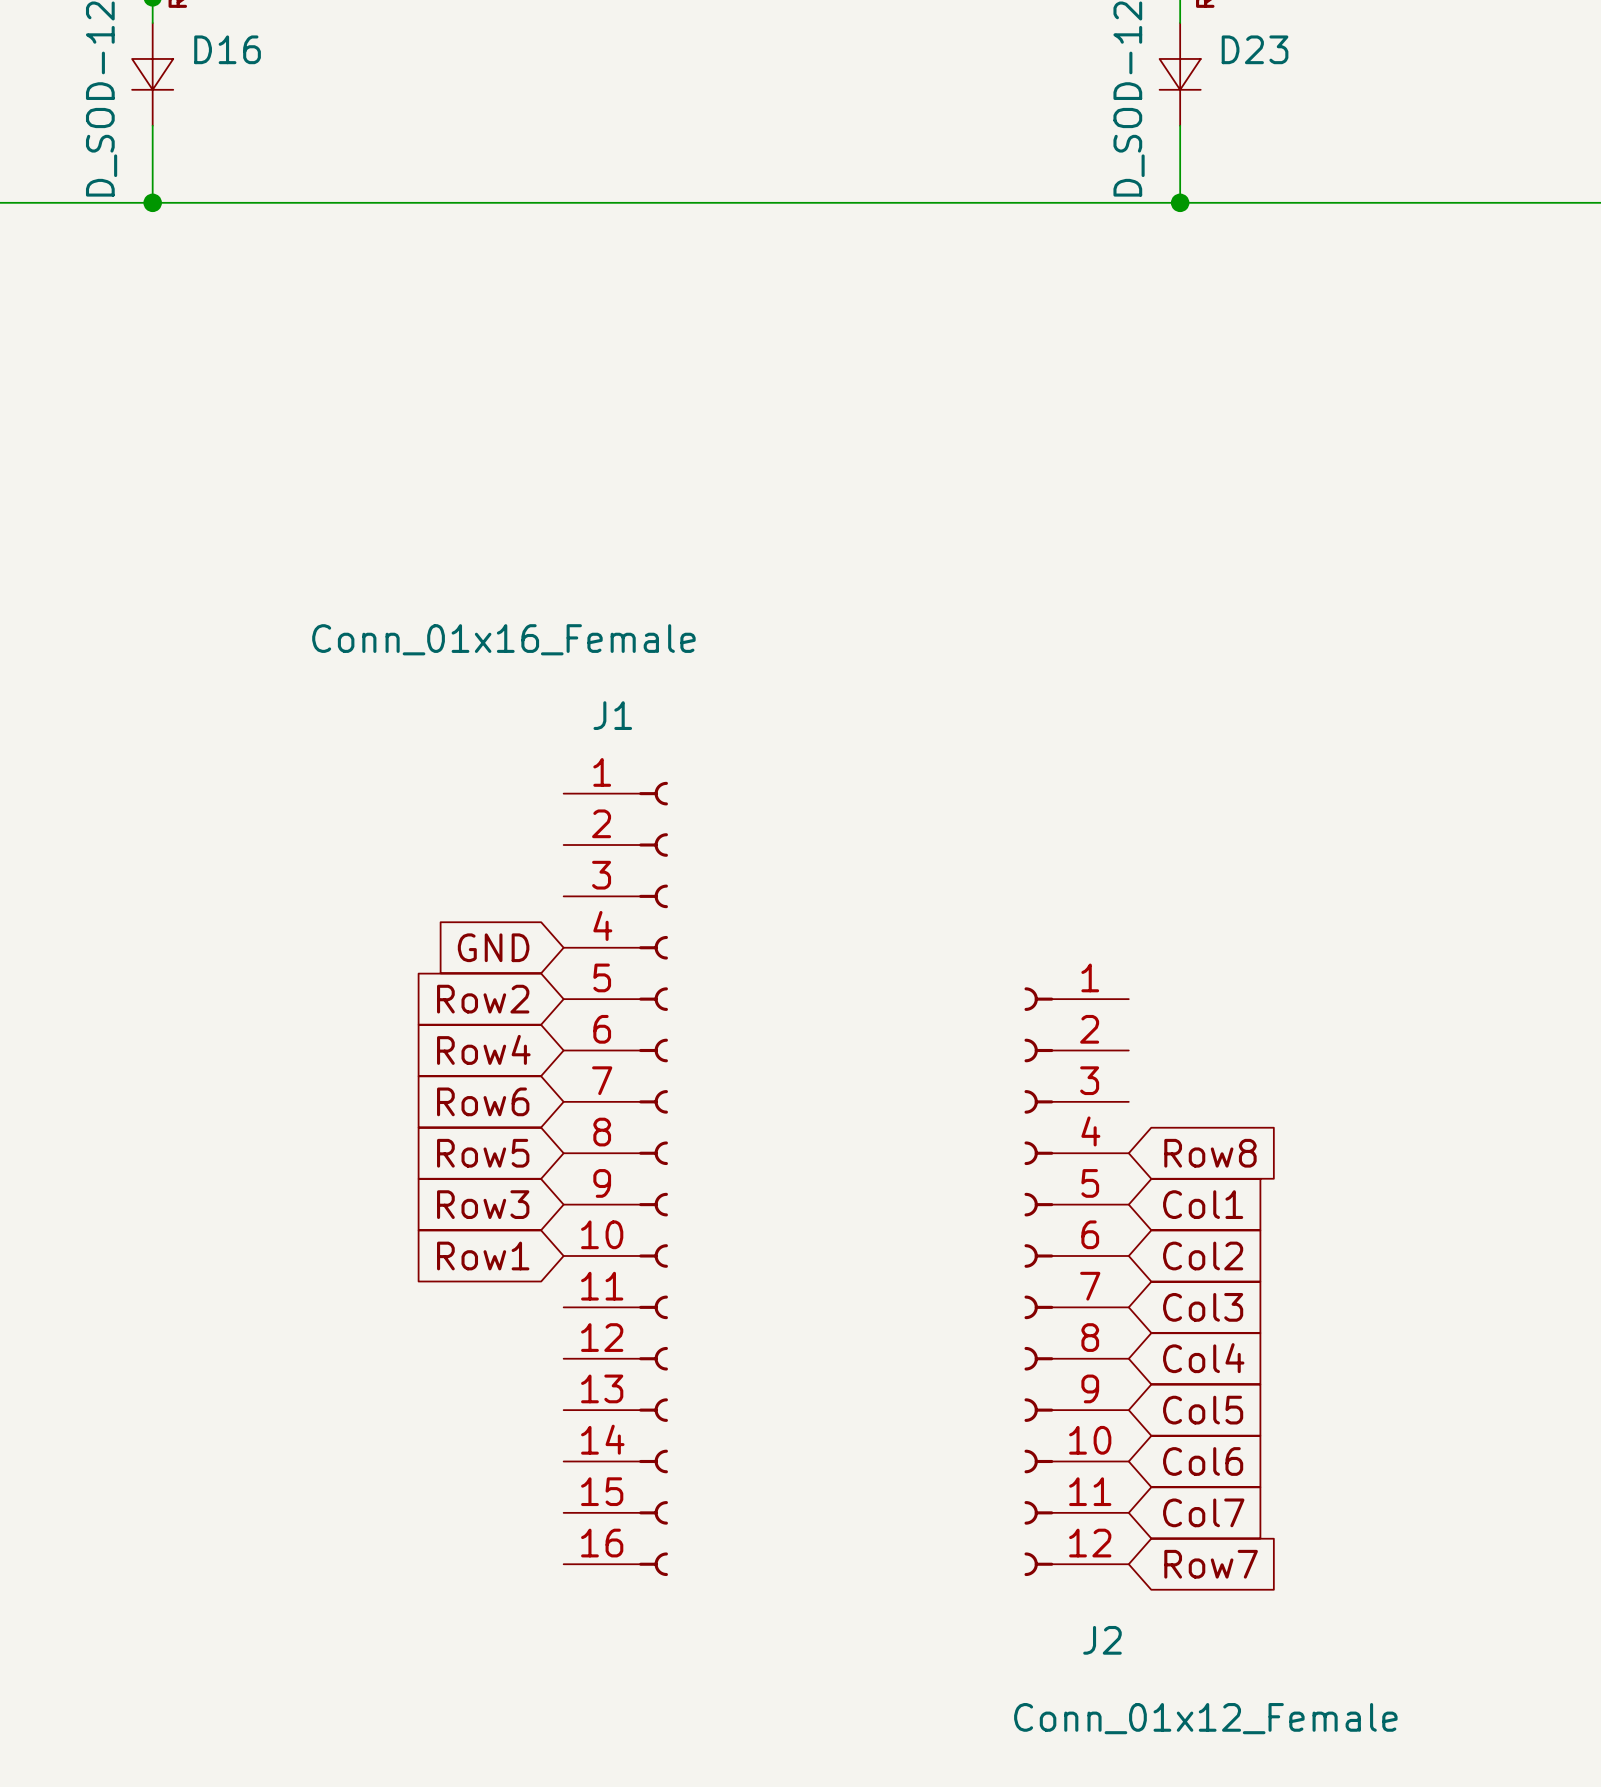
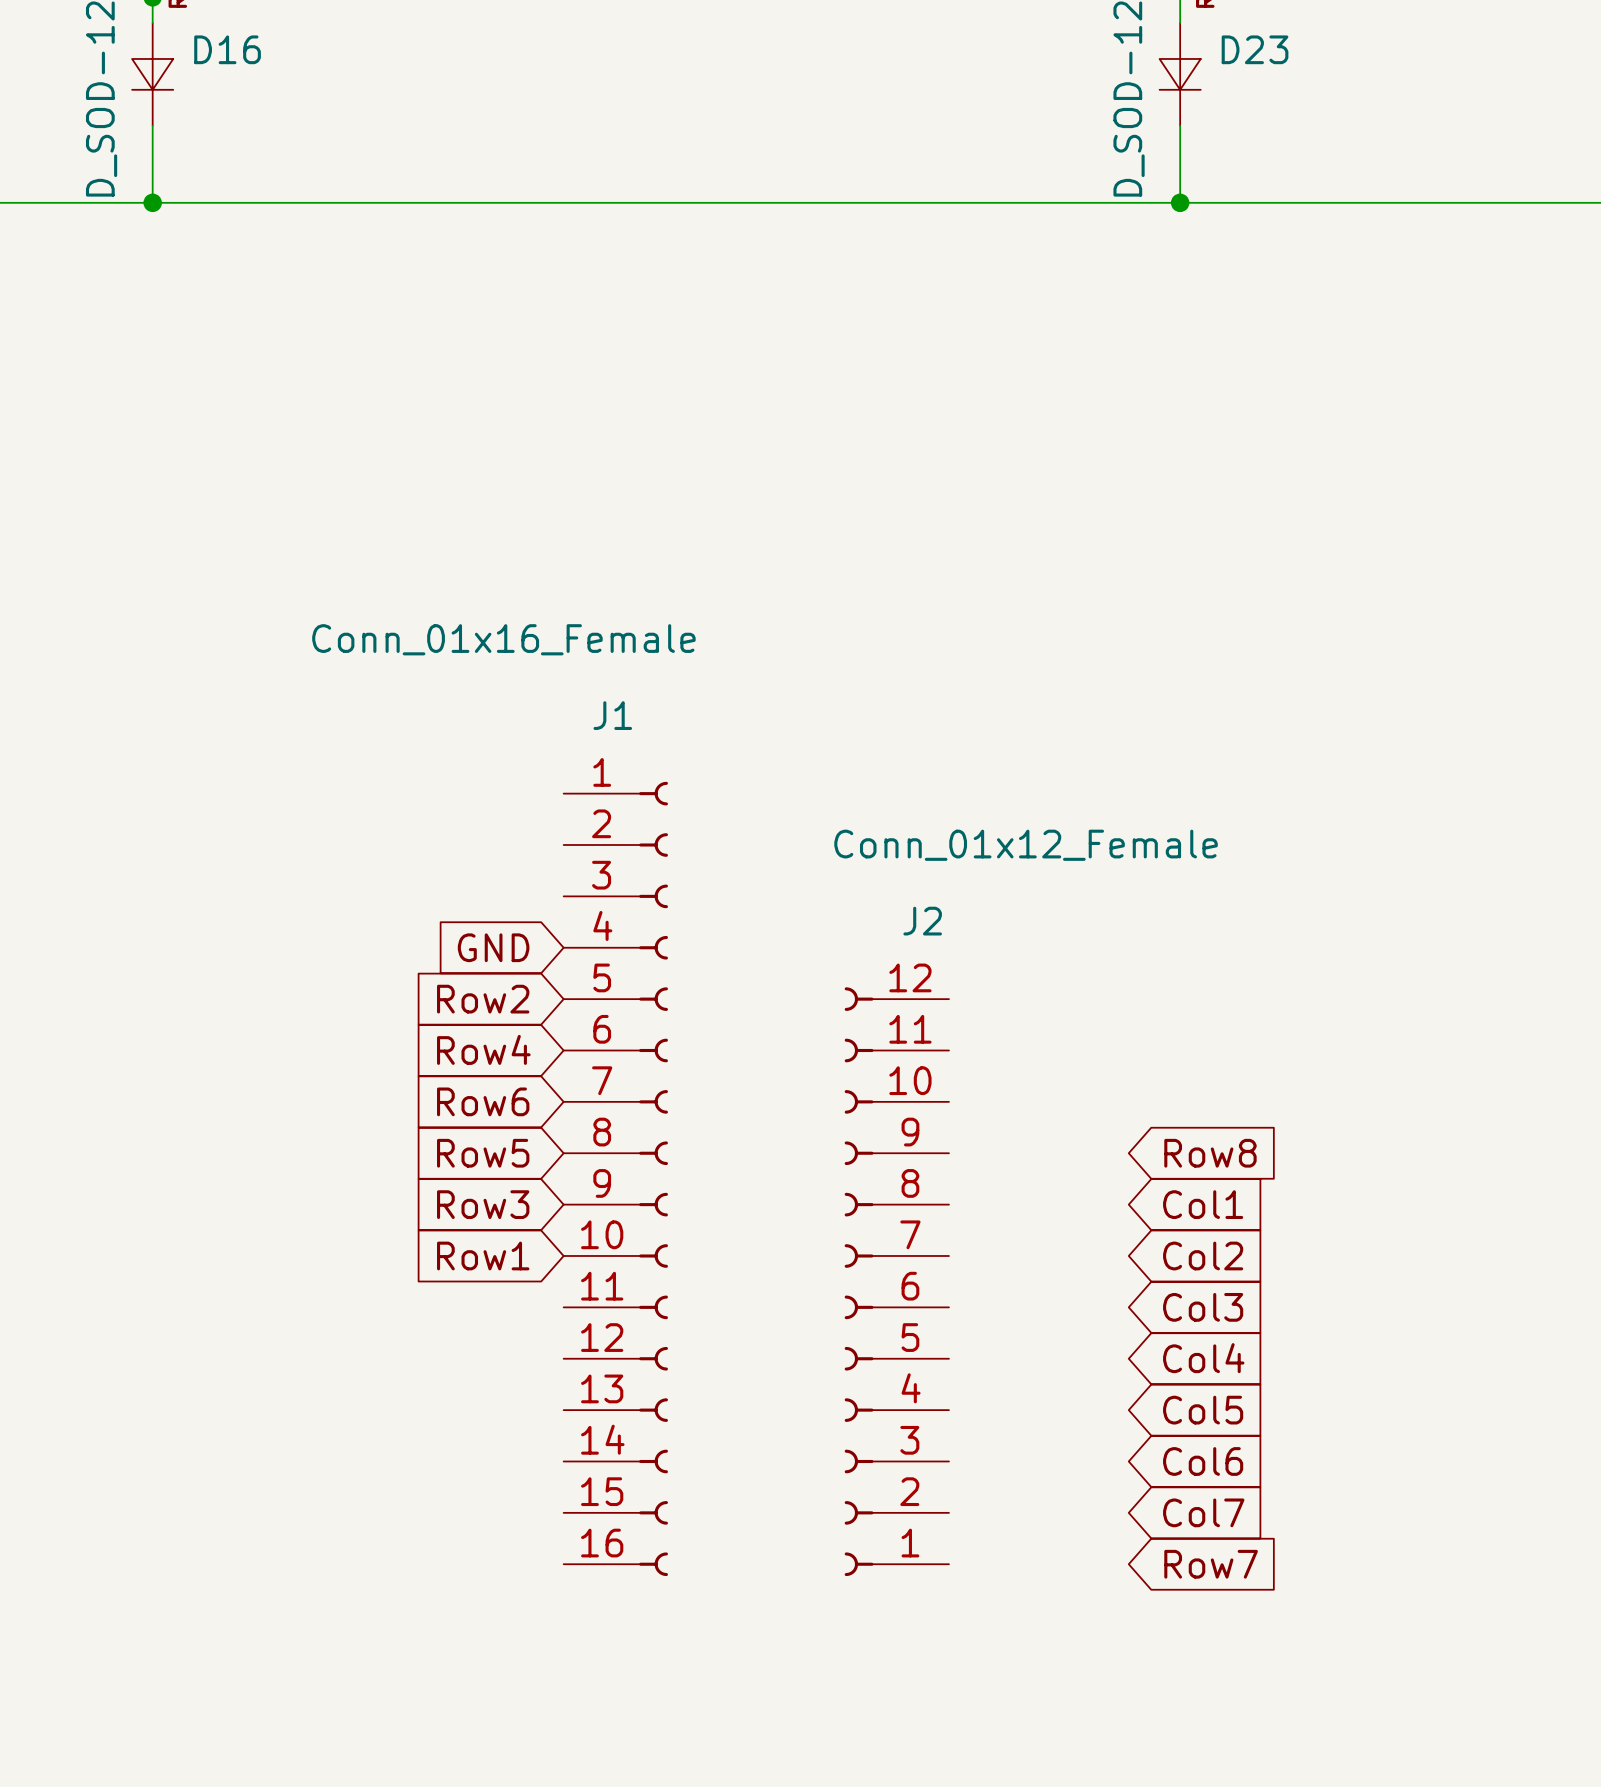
J2 flip: as is (1038, 1281) -> up-down (859, 1281)

